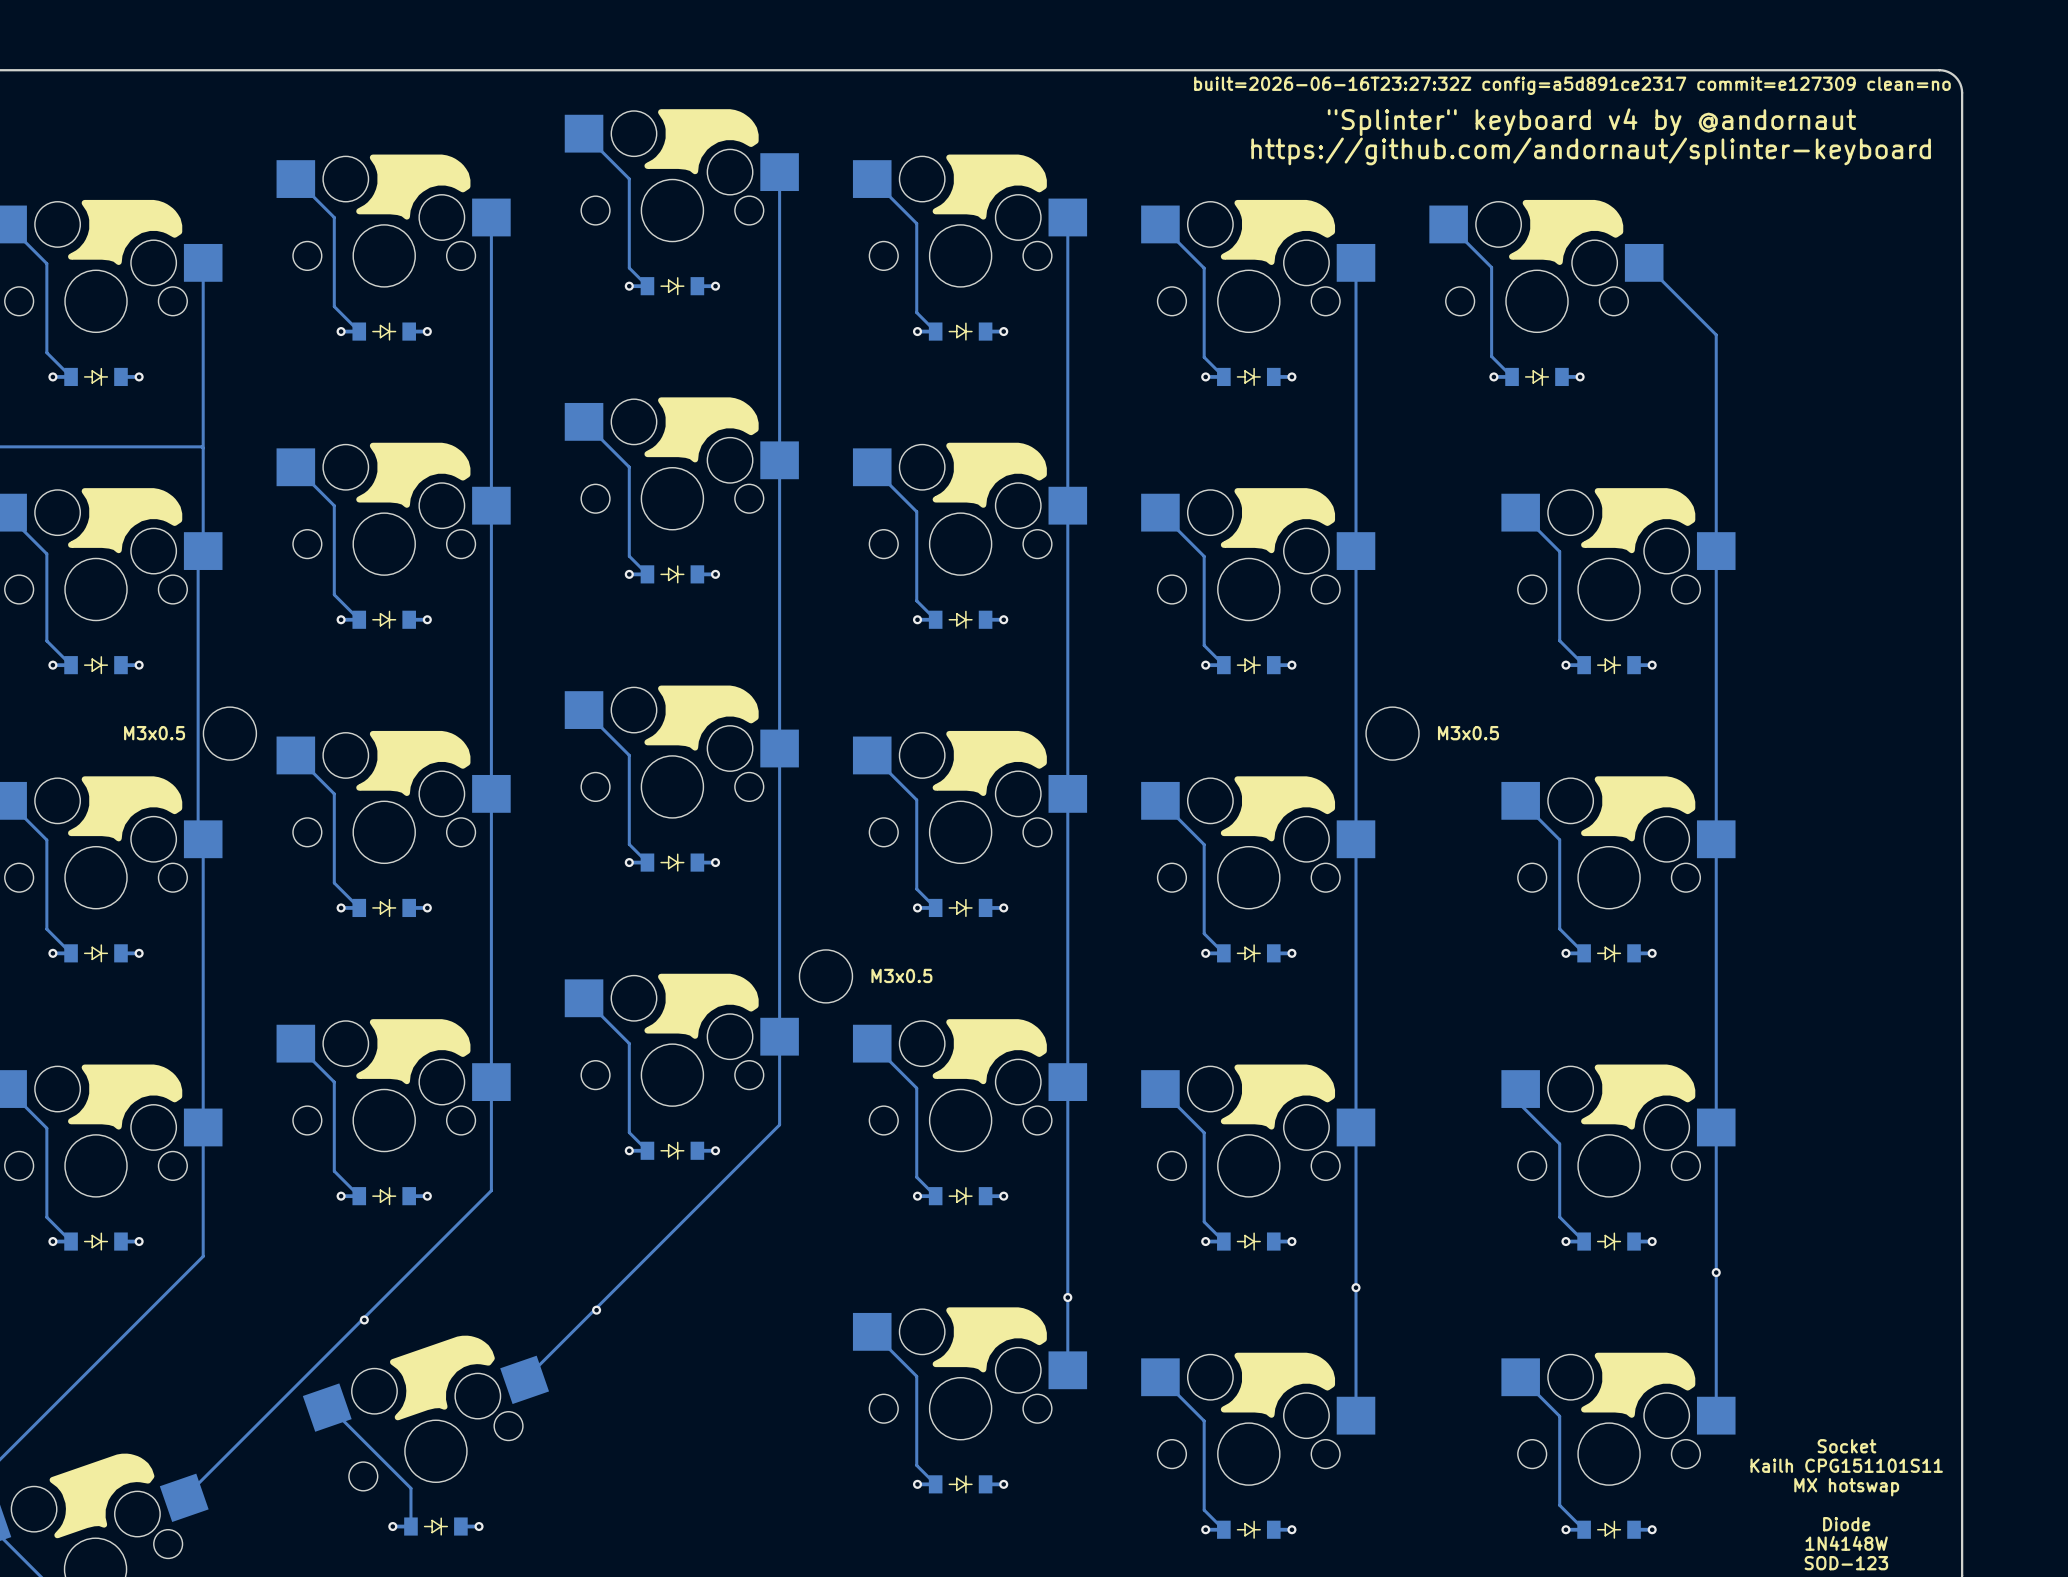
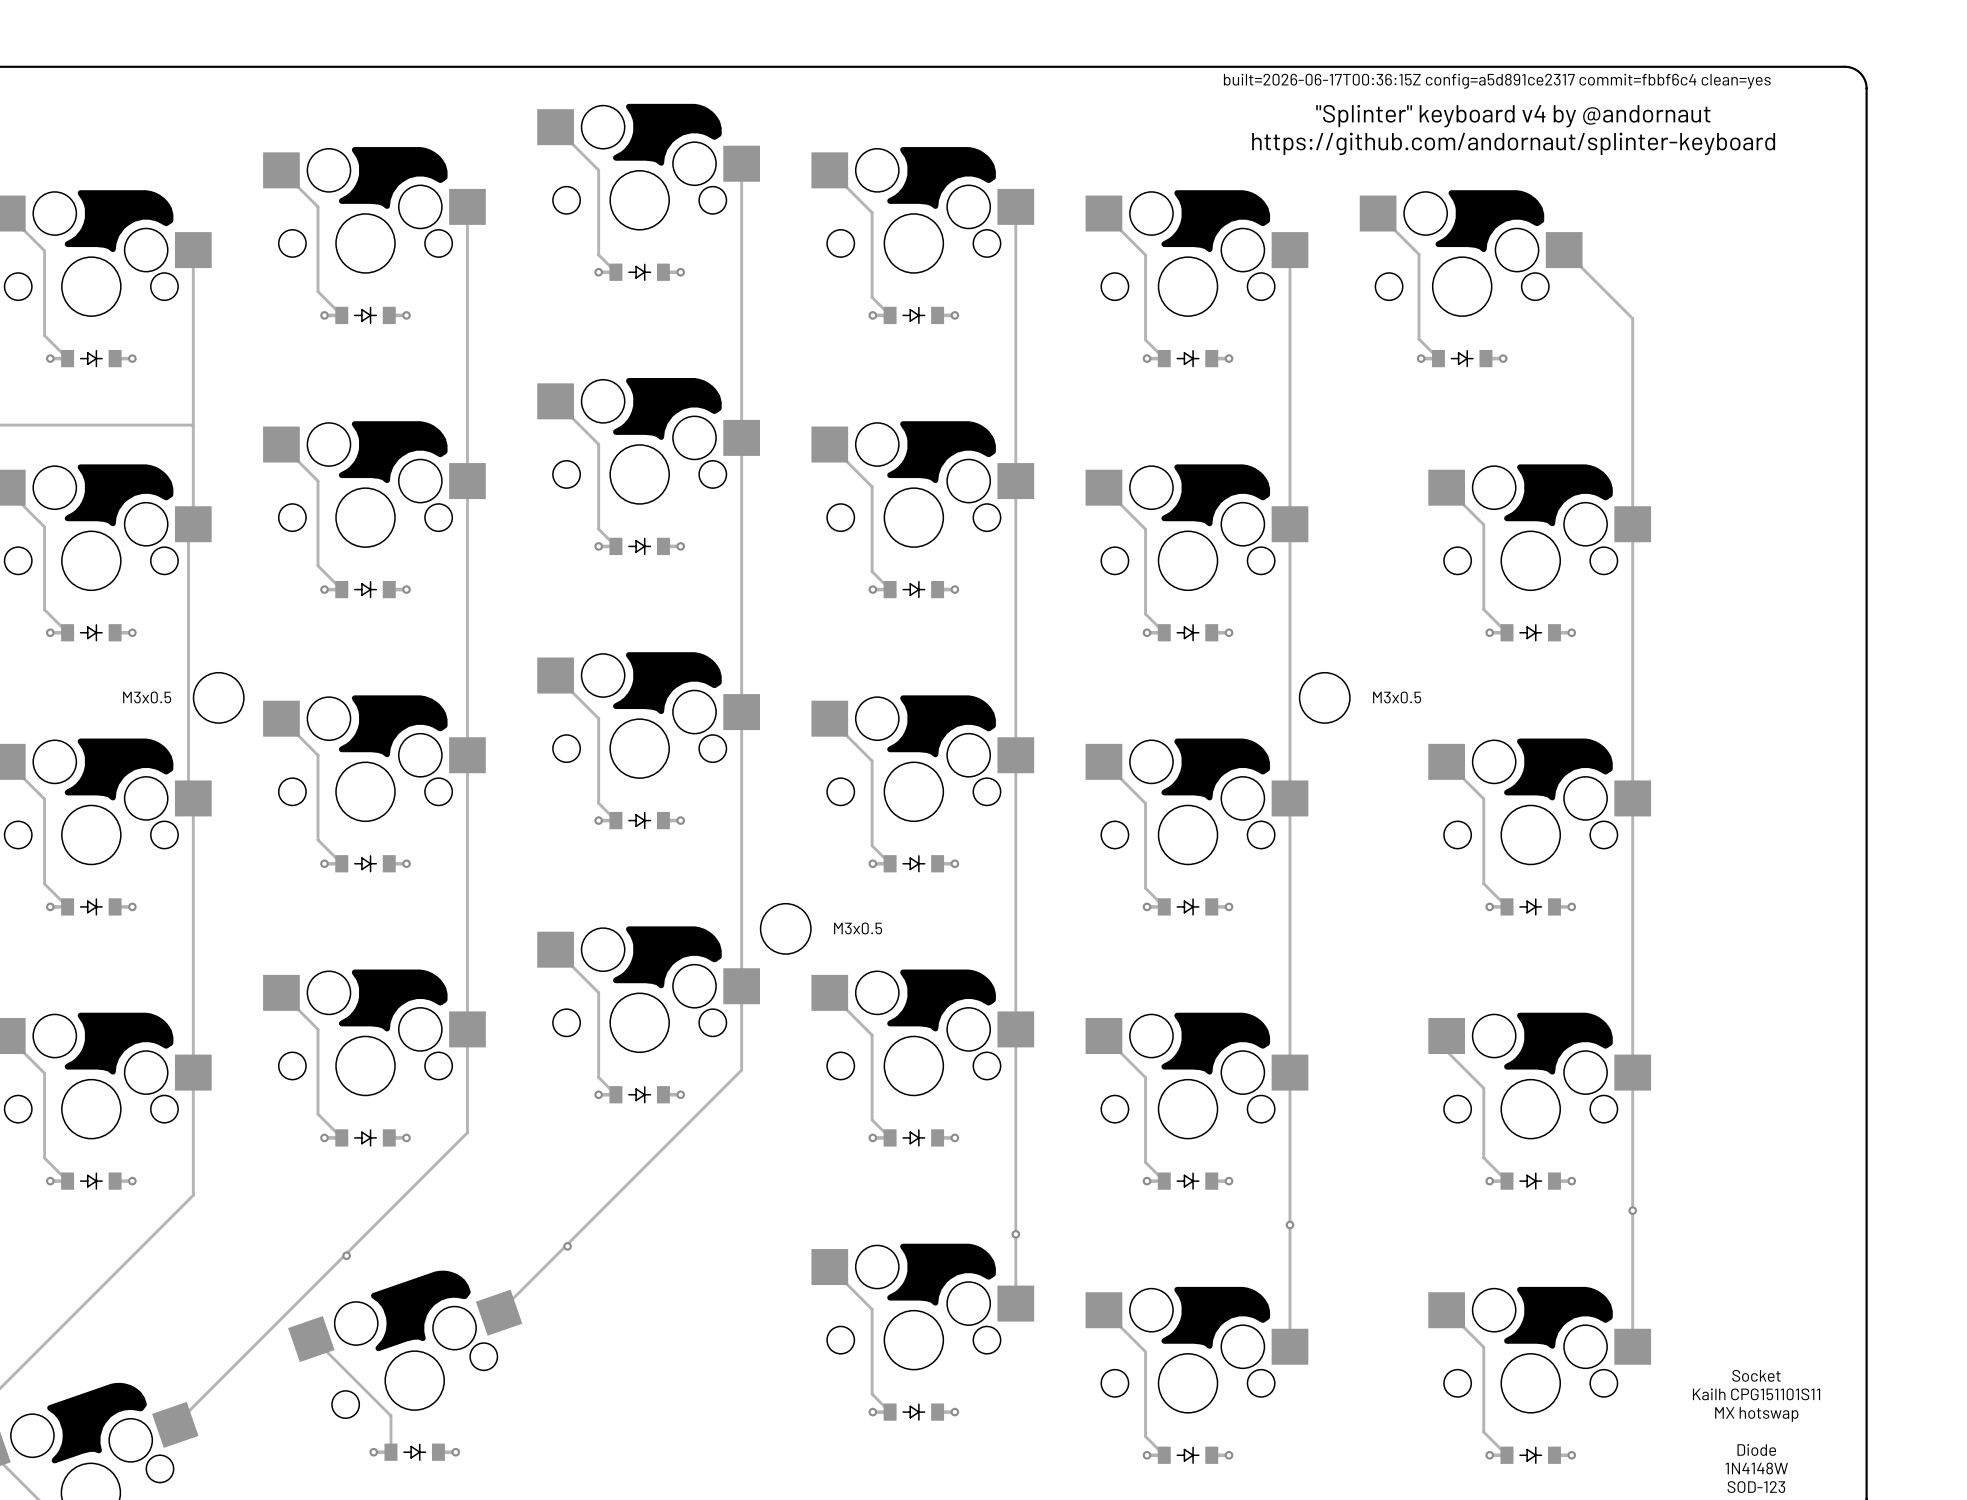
text: built=2026-06-16T23:27:32Z config=a5d891ce2317 commit=e127309 clean=no (1572, 85) -> built=2026-06-17T00:36:15Z config=a5d891ce2317 commit=fbbf6c4 clean=yes (1497, 81)

